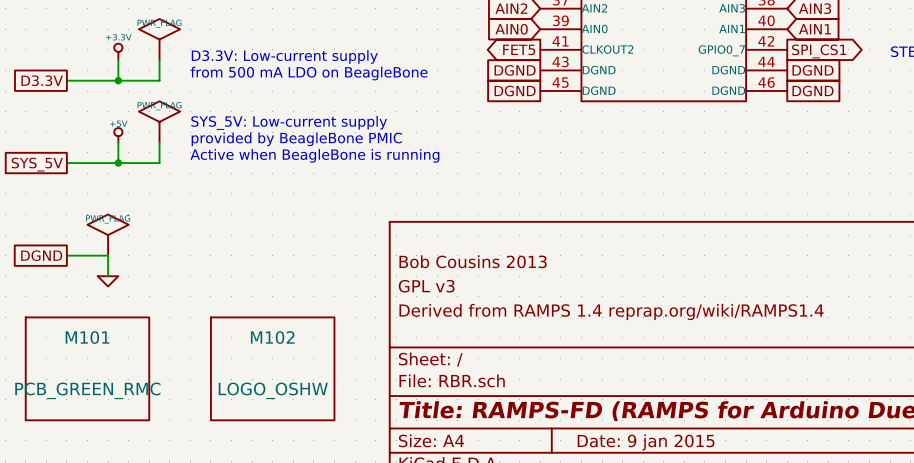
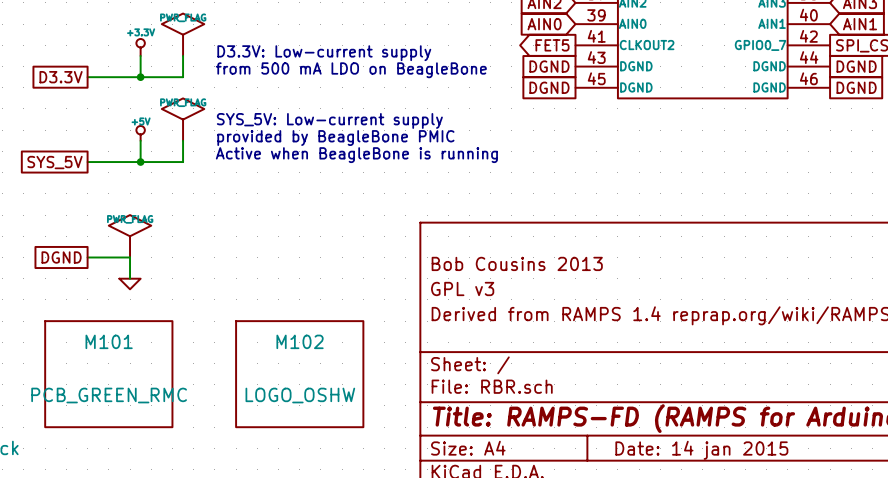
title block: Date: 9 jan 2015 (646, 442) -> Date: 14 jan 2015 (701, 450)

